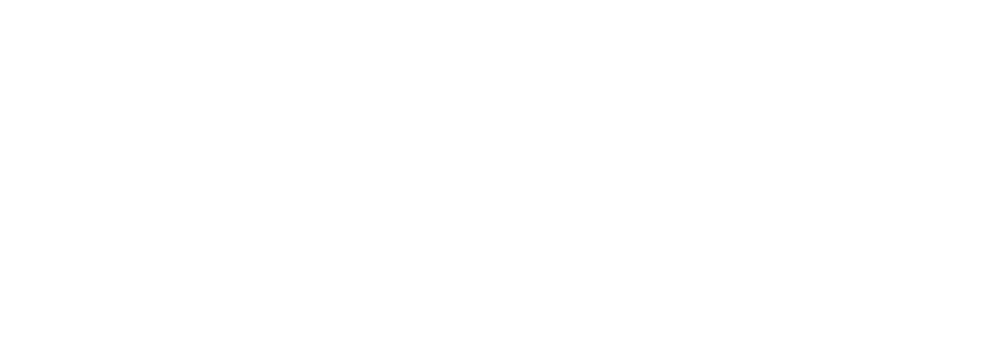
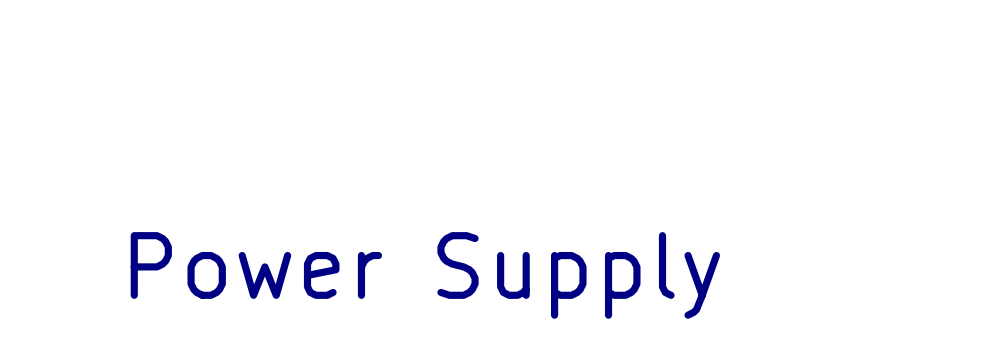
text: none -> Power Supply (425, 275)

